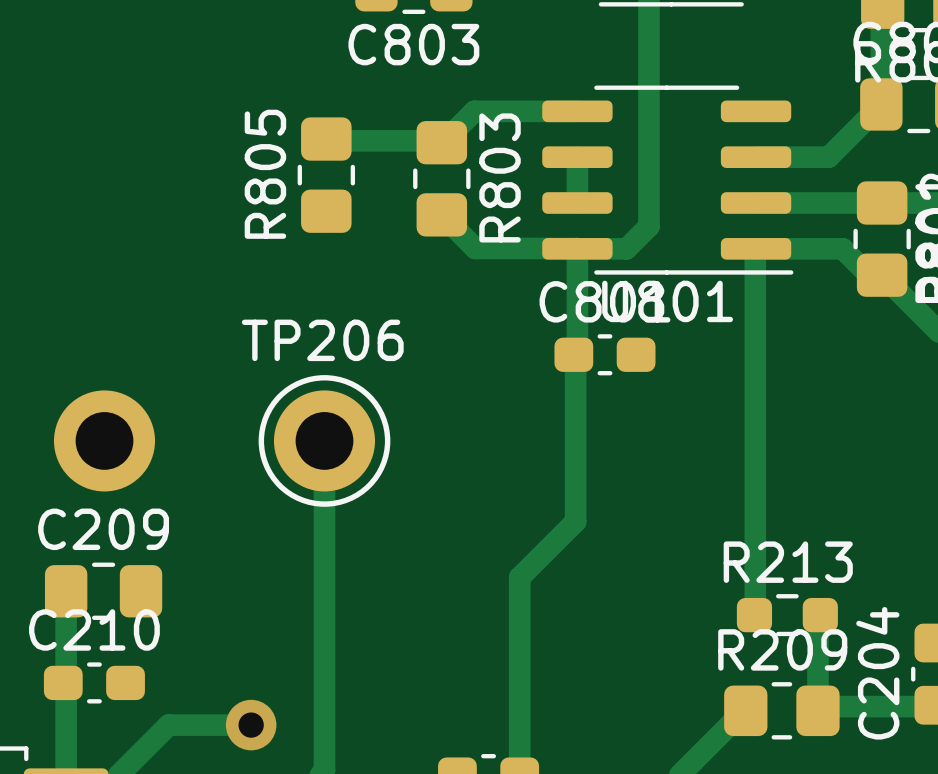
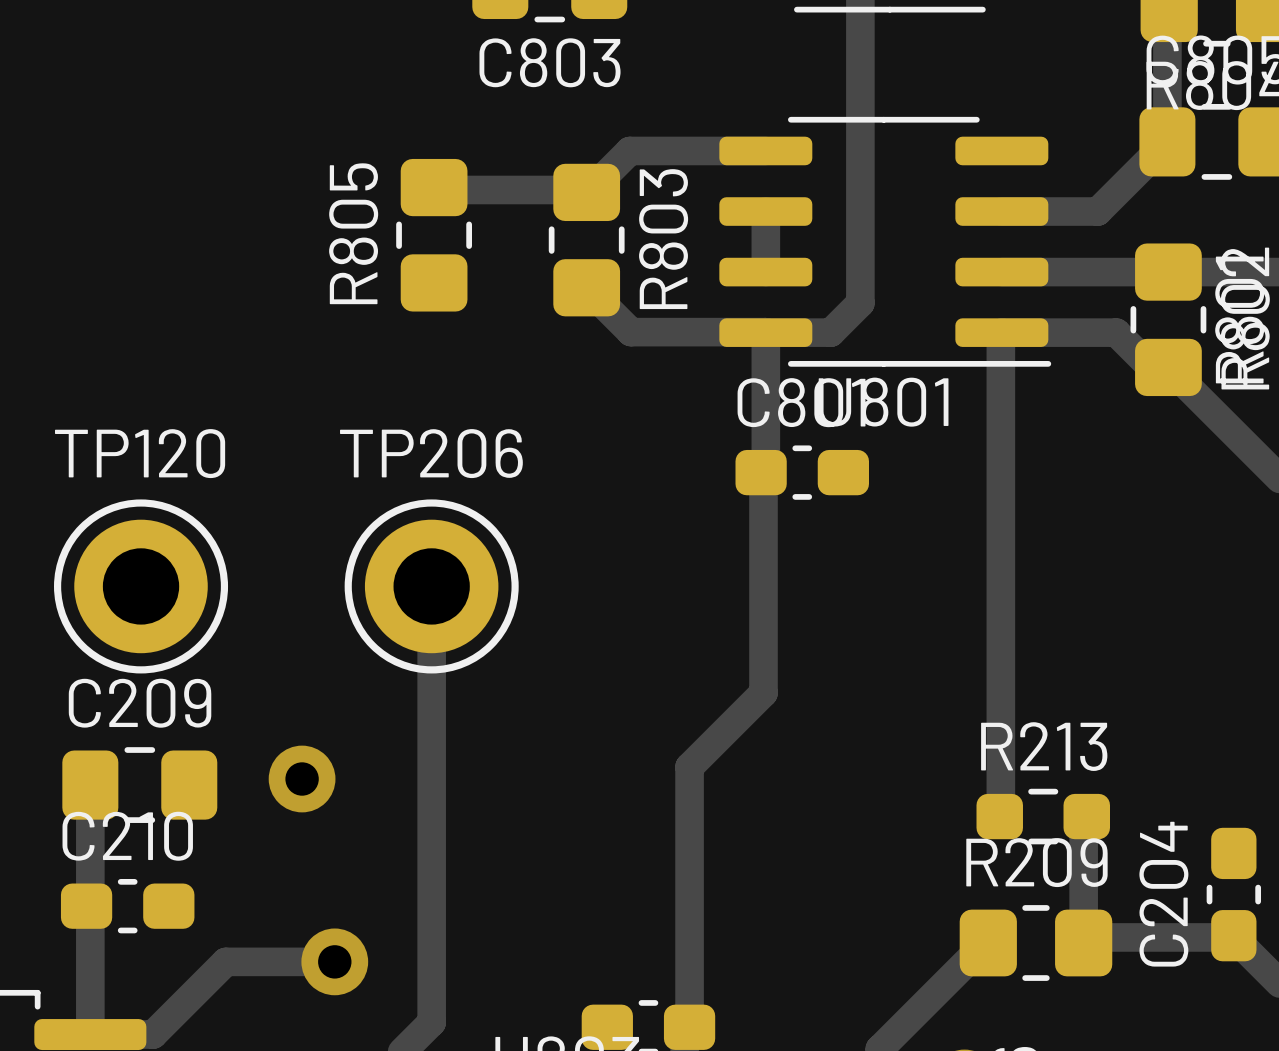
TP120: none -> (141, 586)
via: none -> (302, 779)

